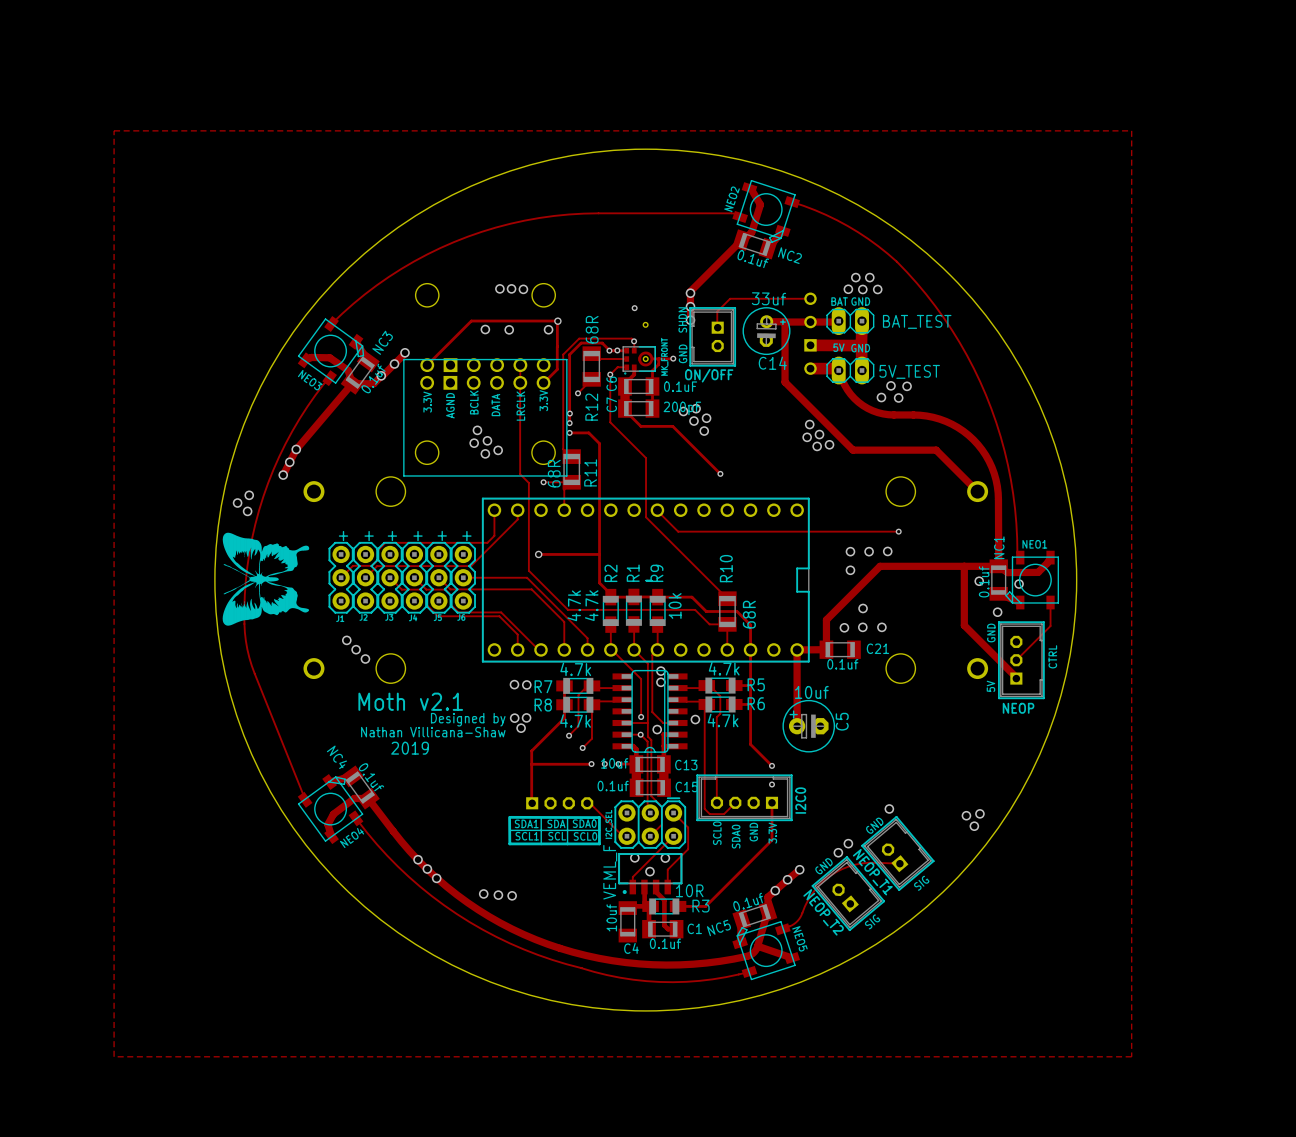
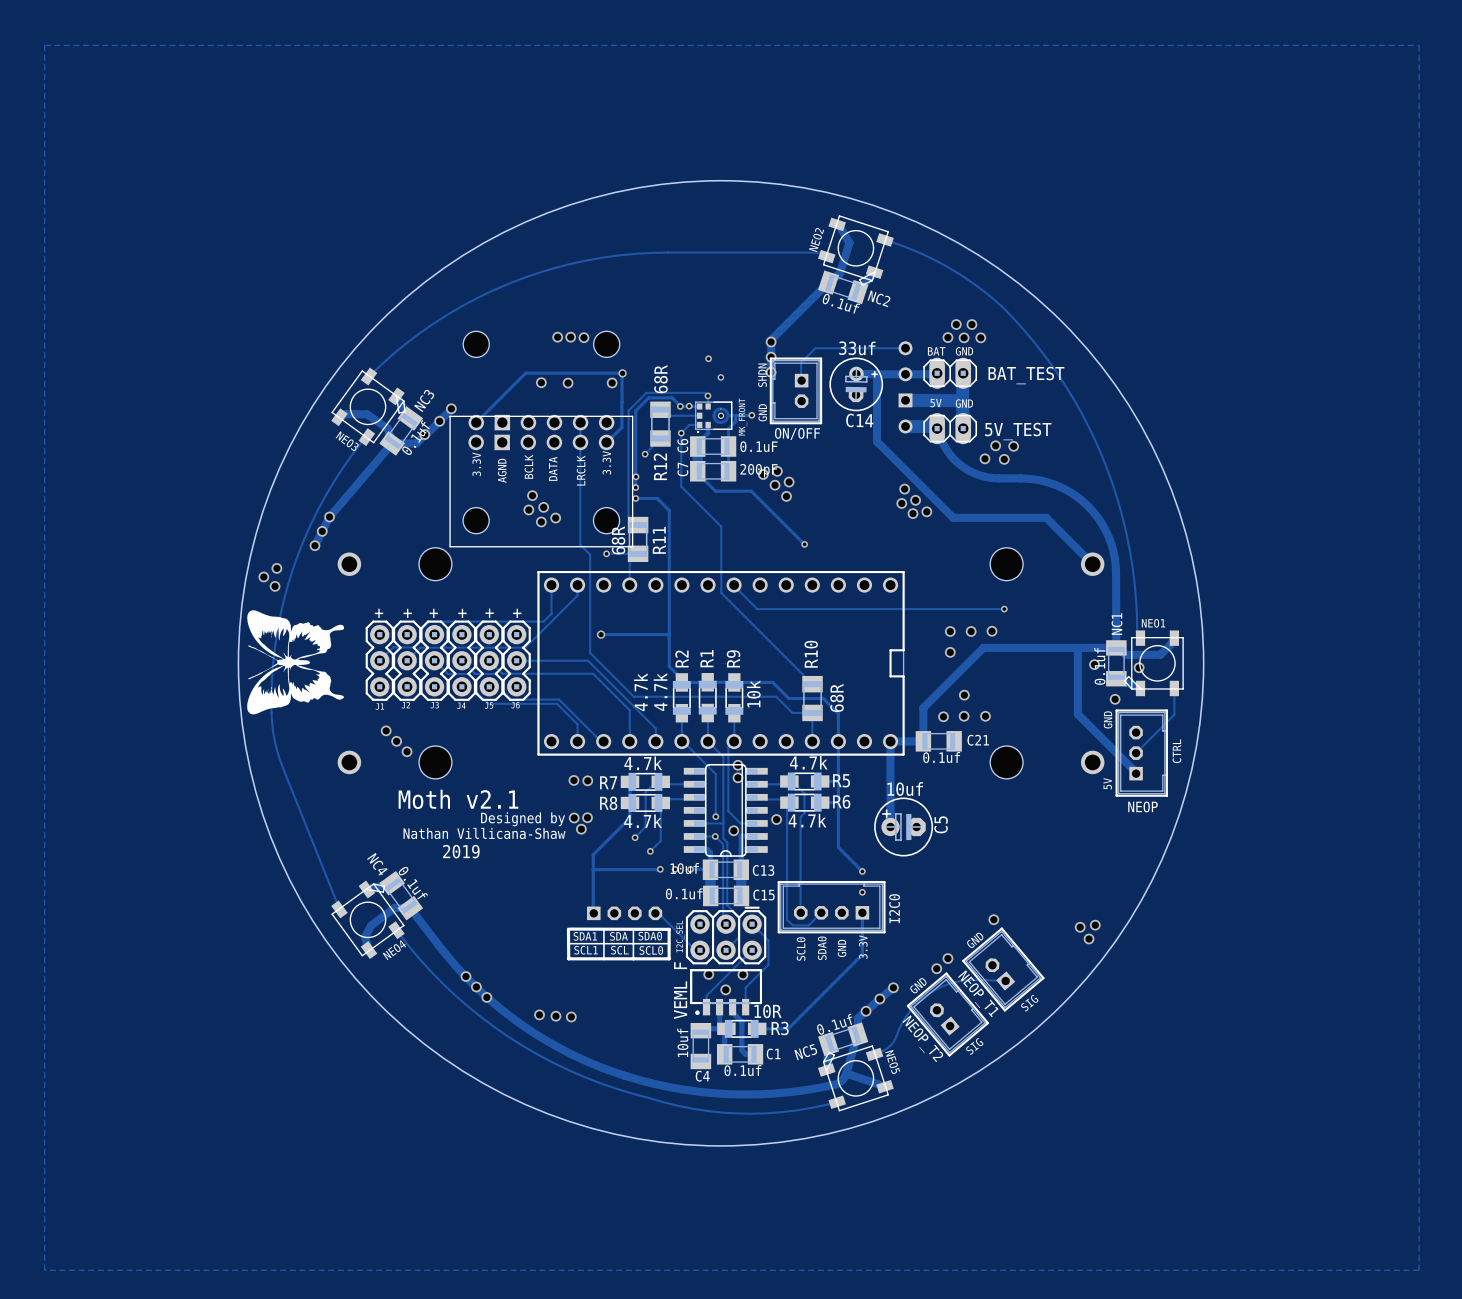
zone outline: (114, 130) (1131, 130) (1131, 1056) (114, 1056) (114, 130) -> (44, 45) (44, 1270) (1419, 1270) (1419, 45) (44, 45)

